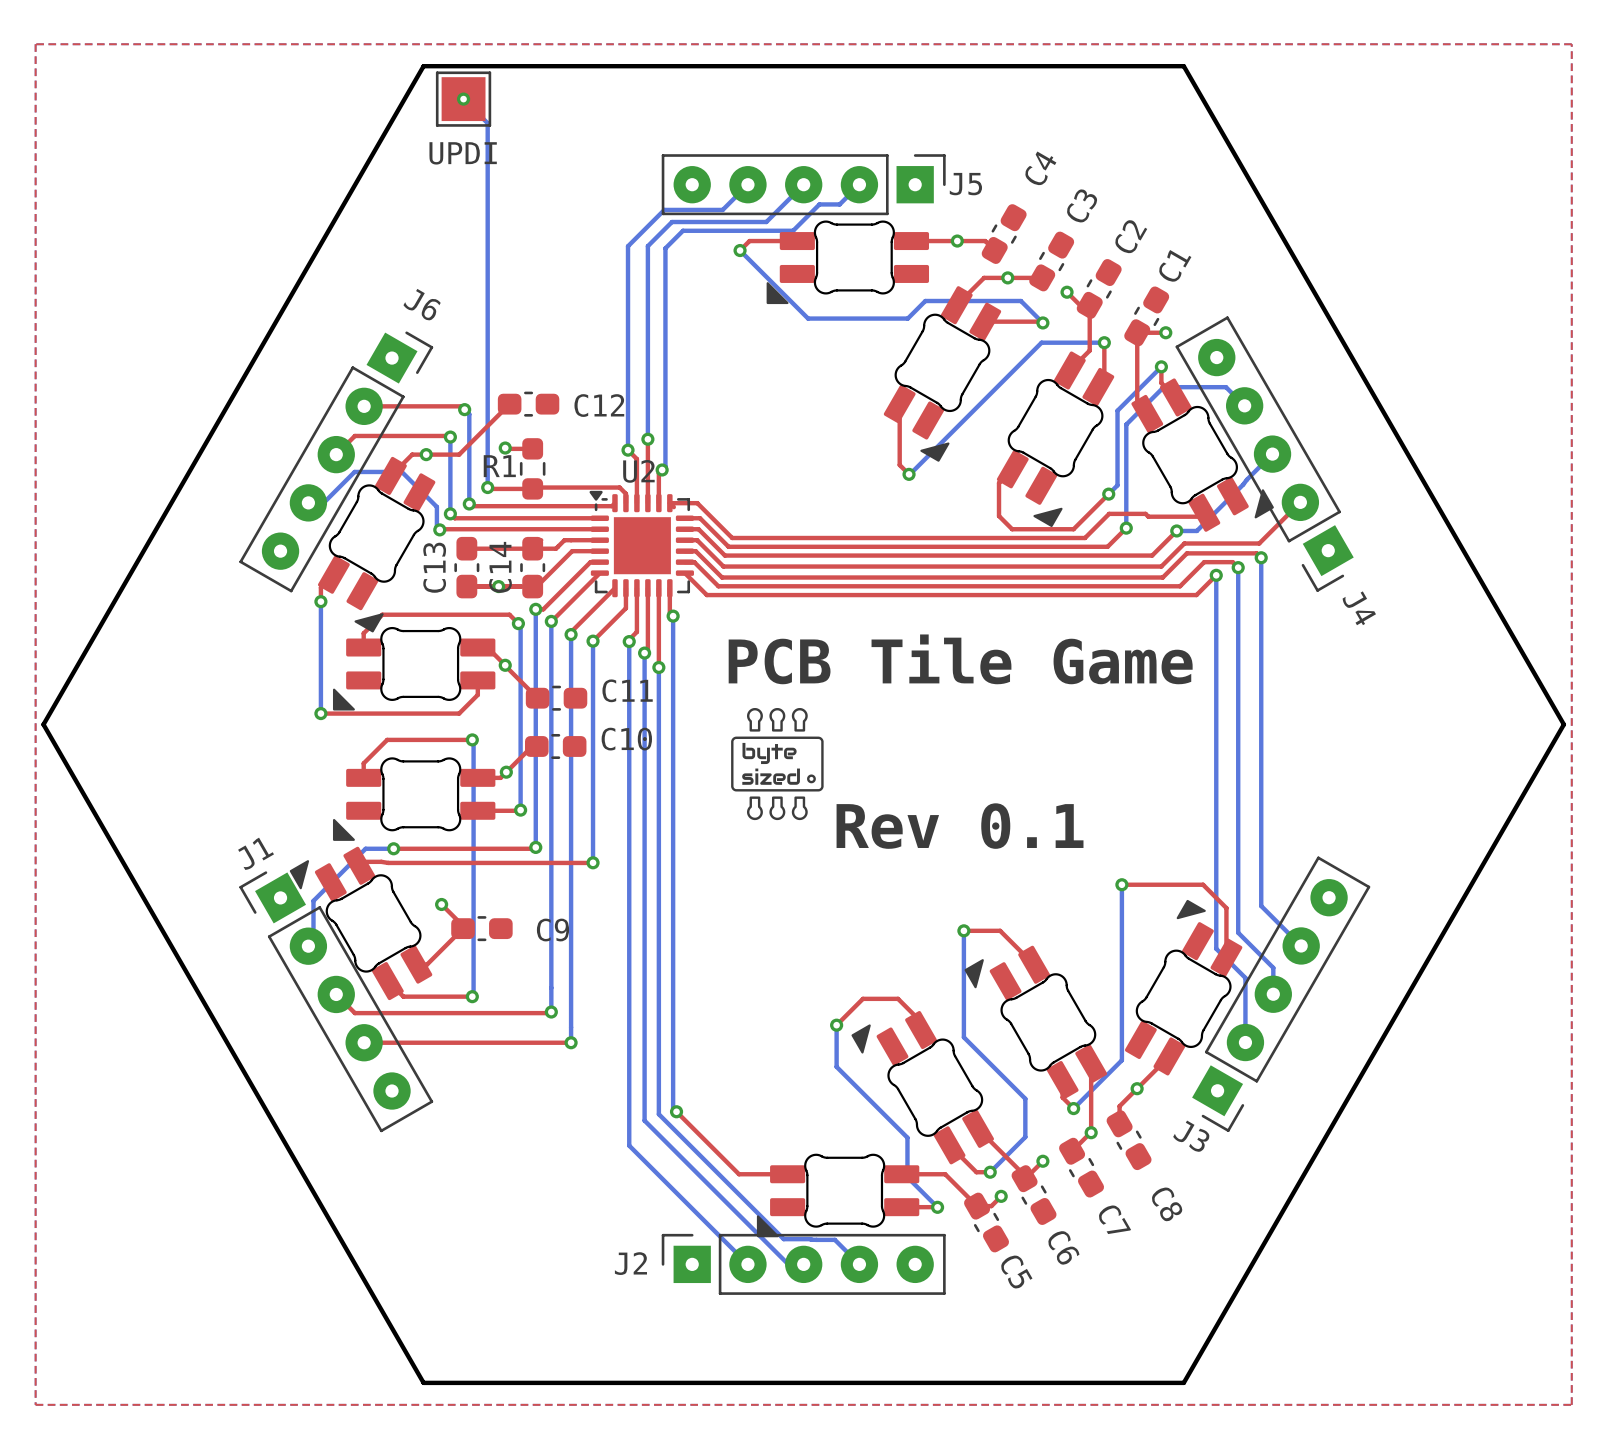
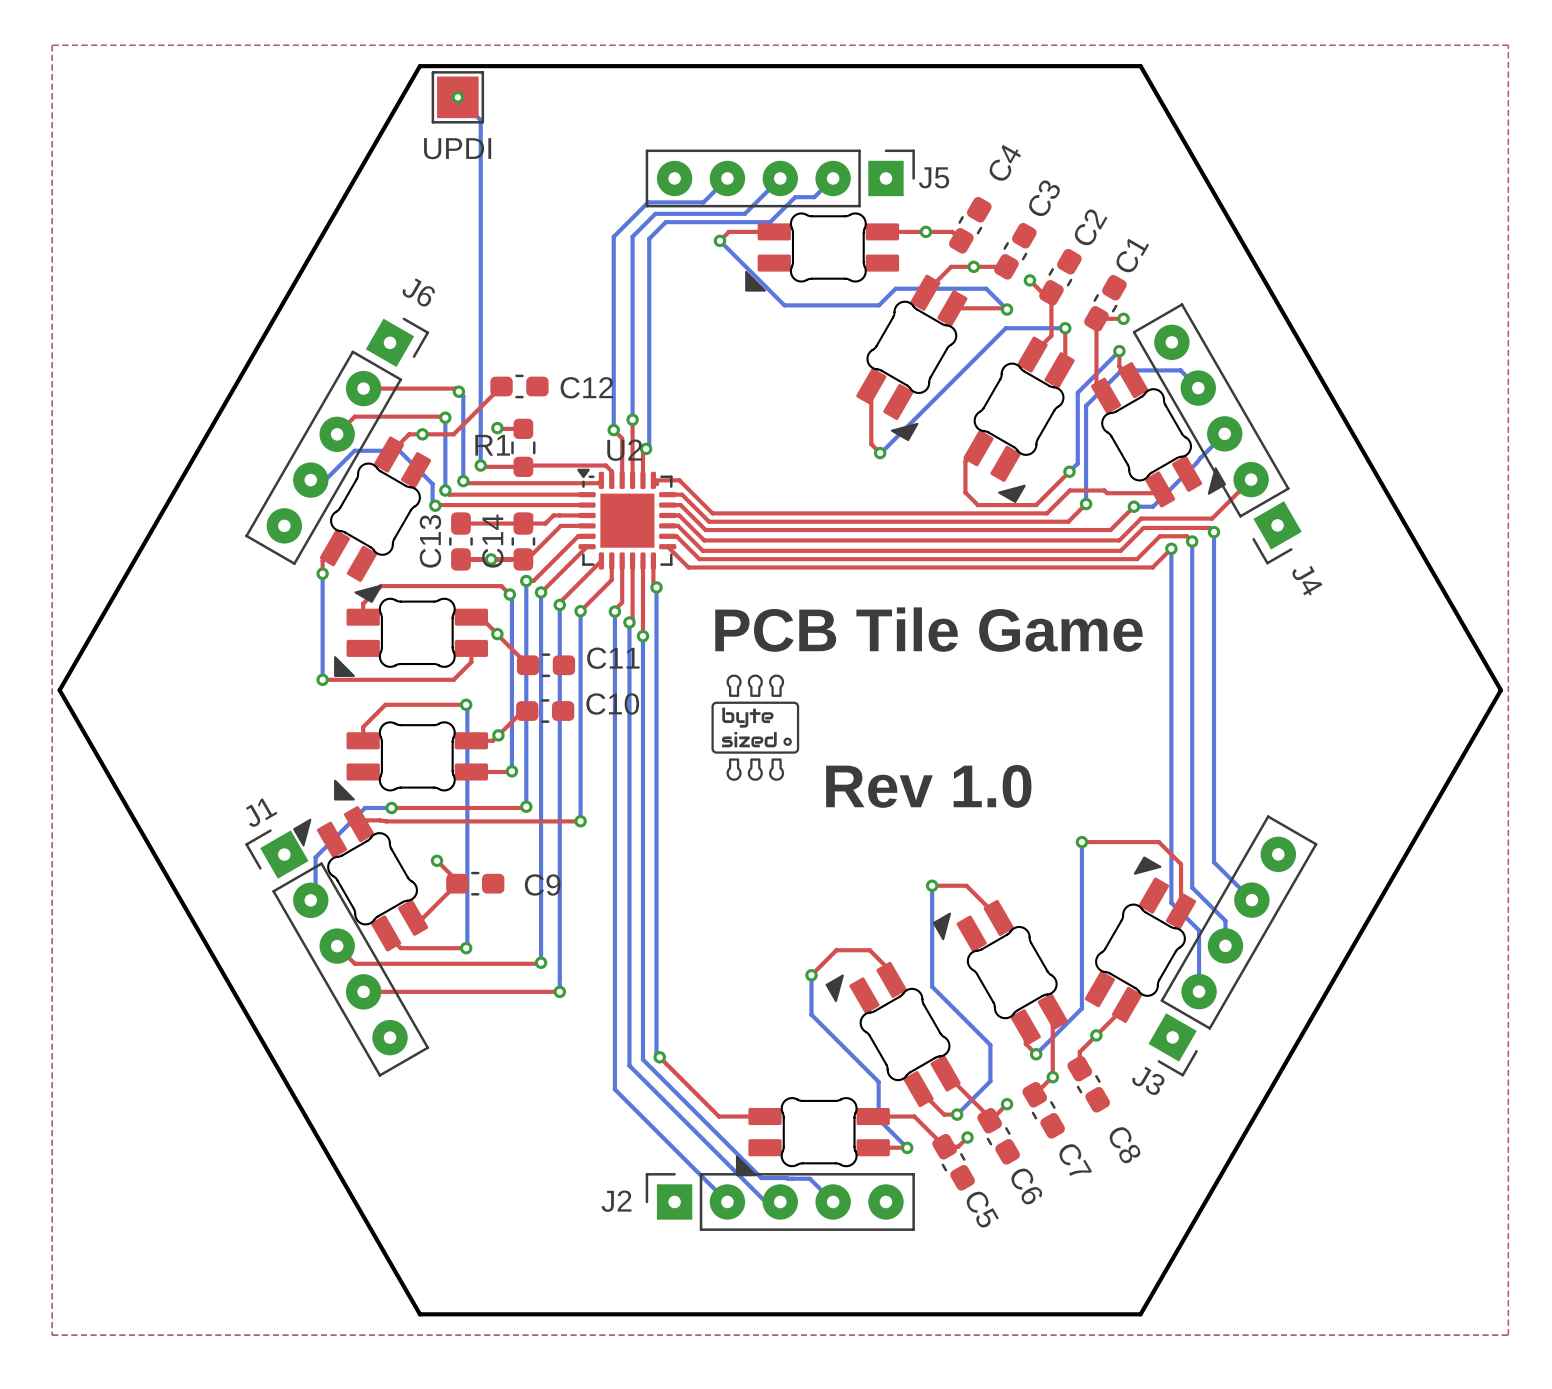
text: Rev 0.1 (960, 826) -> Rev 1.0 (928, 786)

